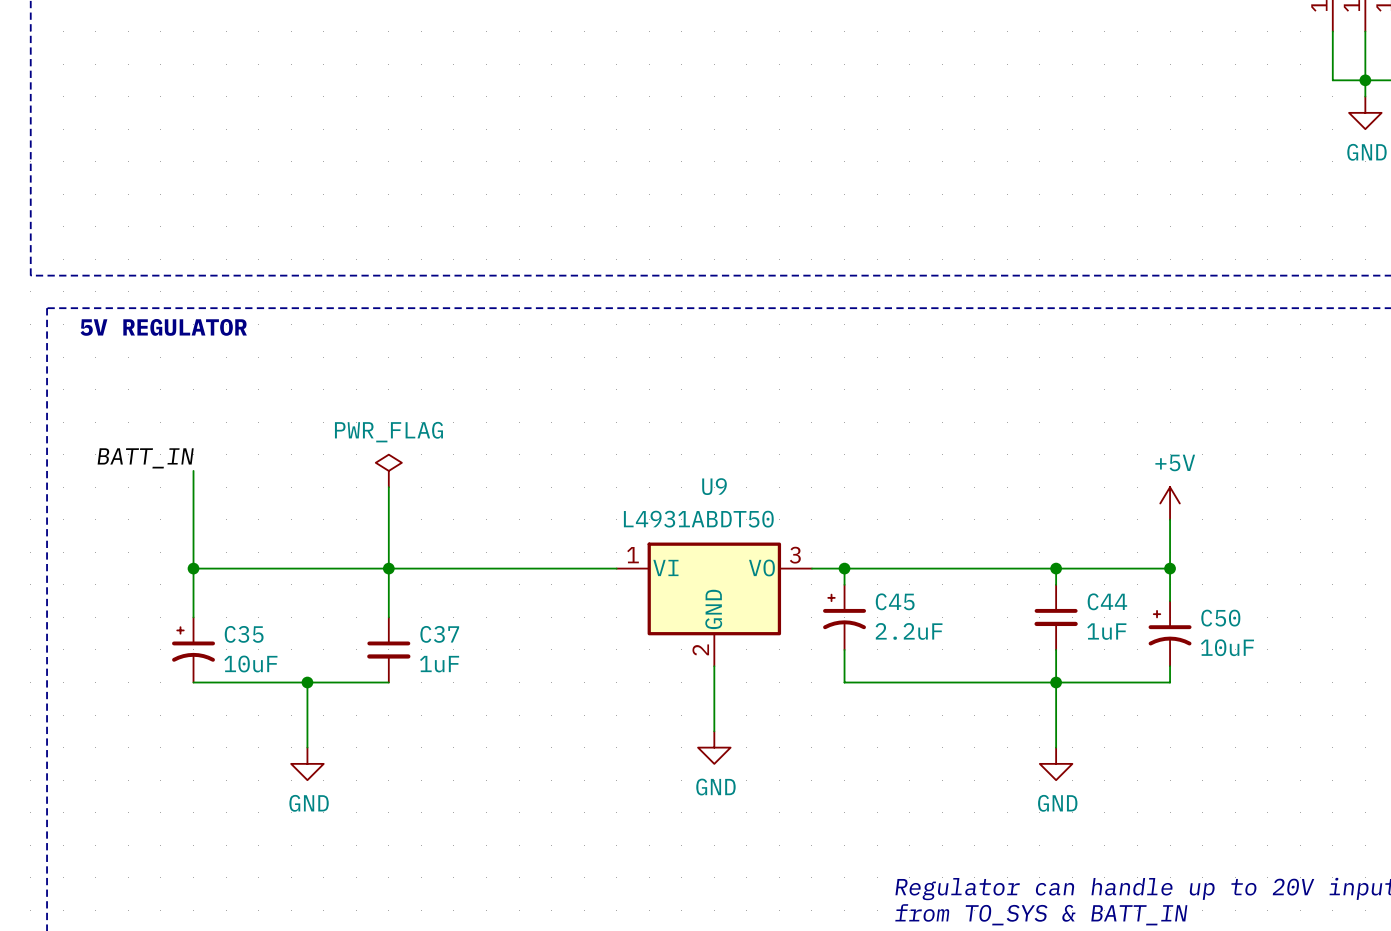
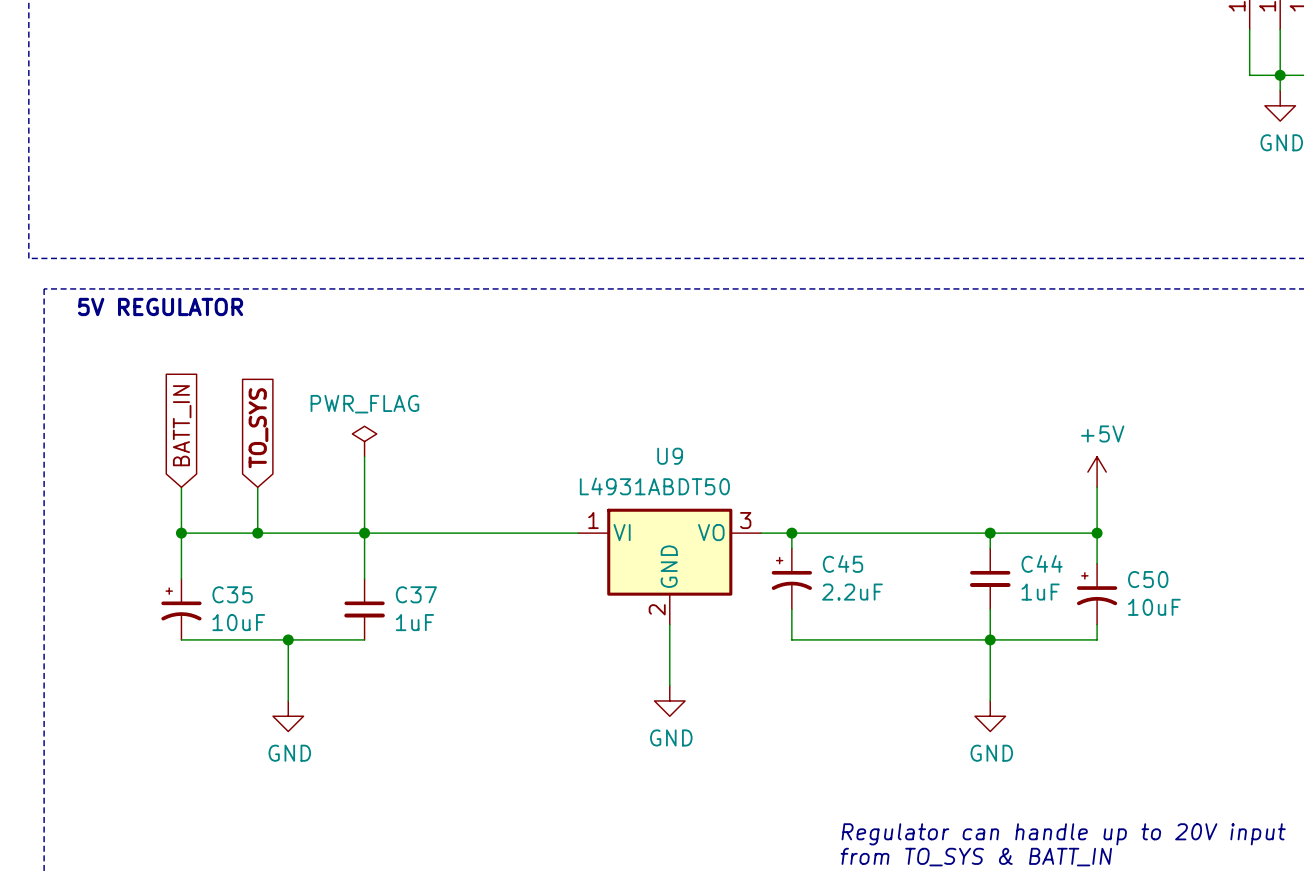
global label: none -> BATT_IN (182, 425)
label: BATT_IN (145, 458) -> none
global label: none -> TO_SYS (258, 428)
wire: (193, 470) (193, 519) -> (257, 487) (257, 533)
junction: none -> (257, 533)

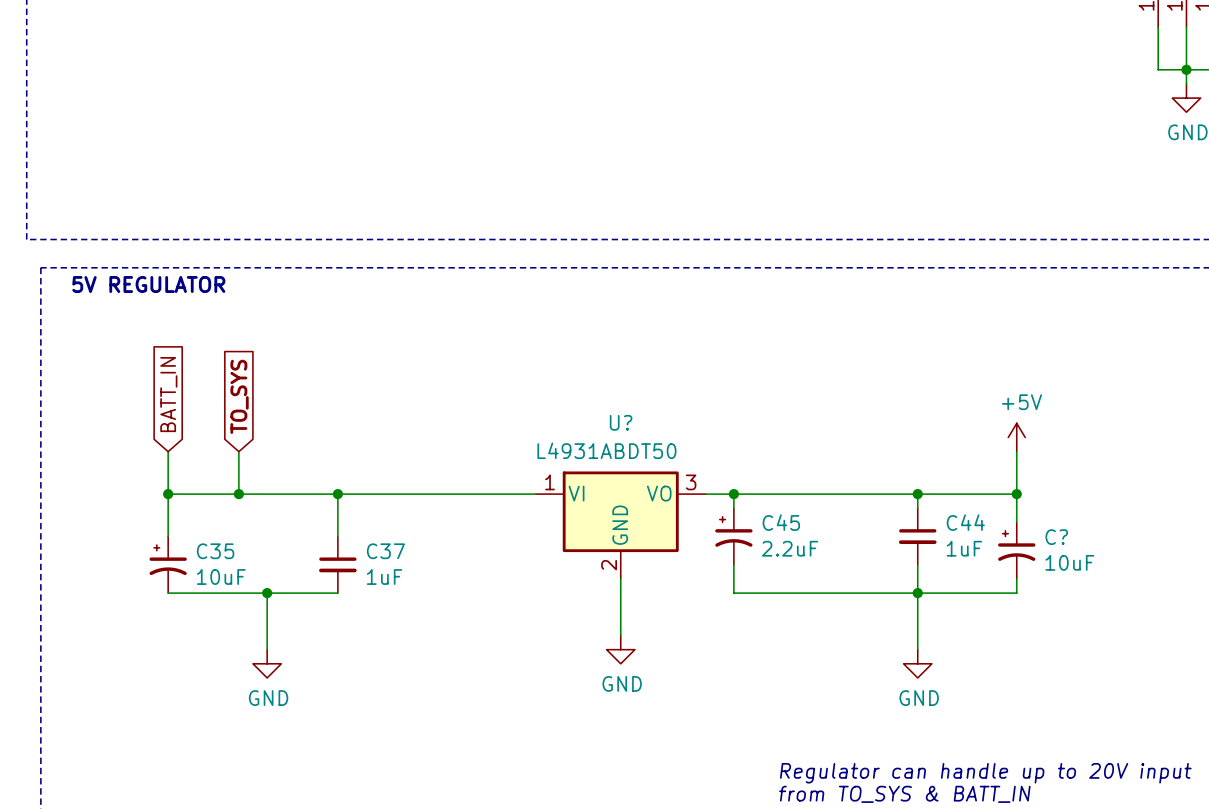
power symbol: PWR_FLAG (364, 441) -> none
wire: (364, 456) (364, 533) -> none
U9 name: U9 (670, 456) -> U? (621, 422)
C50 name: C50 (1148, 579) -> C? (1056, 537)

